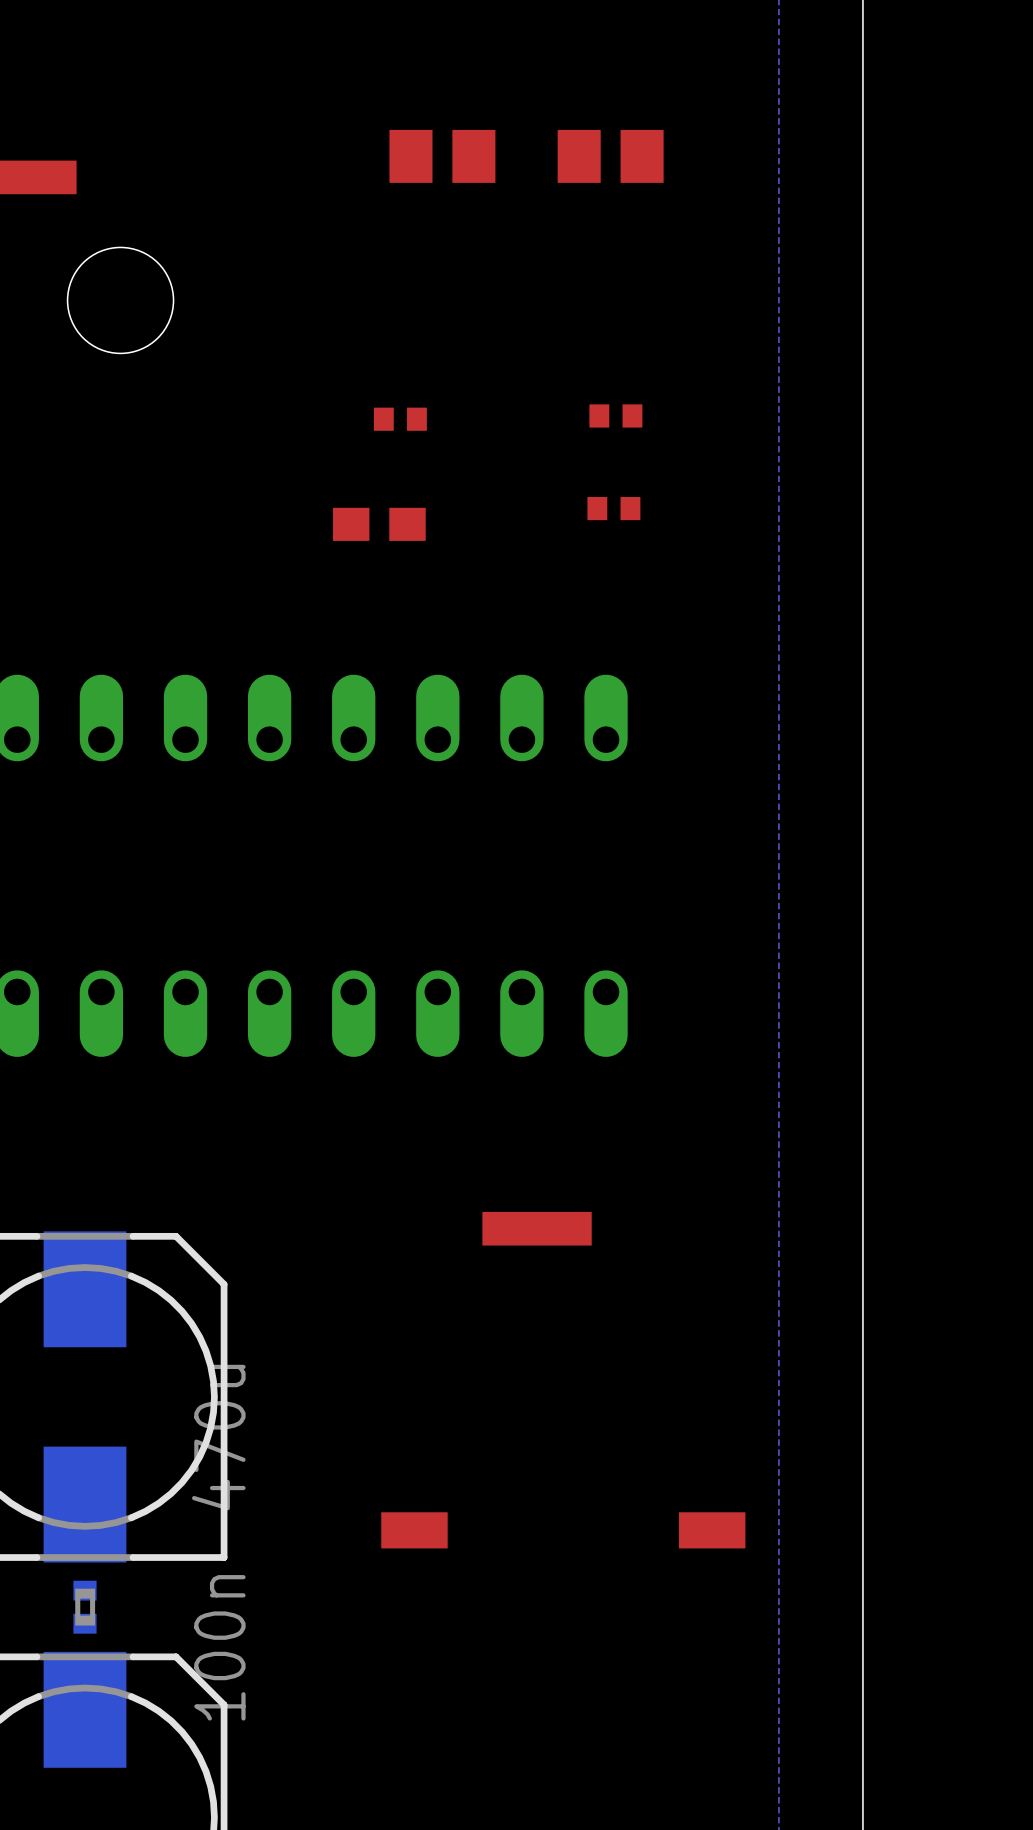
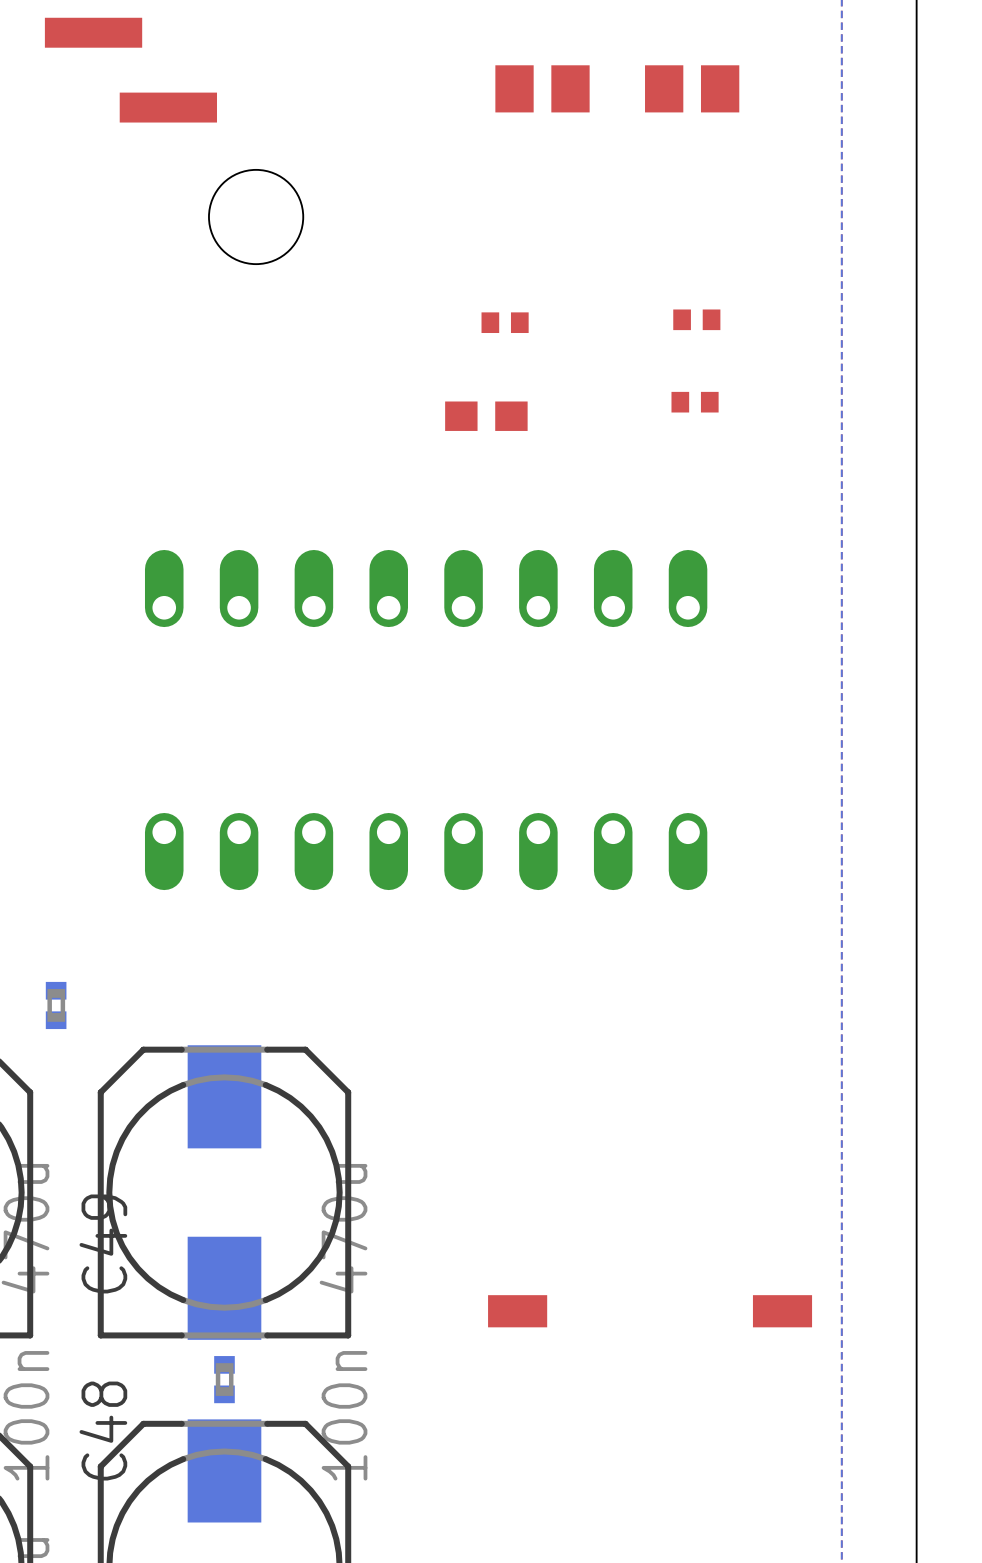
part: (537, 1228) -> none

